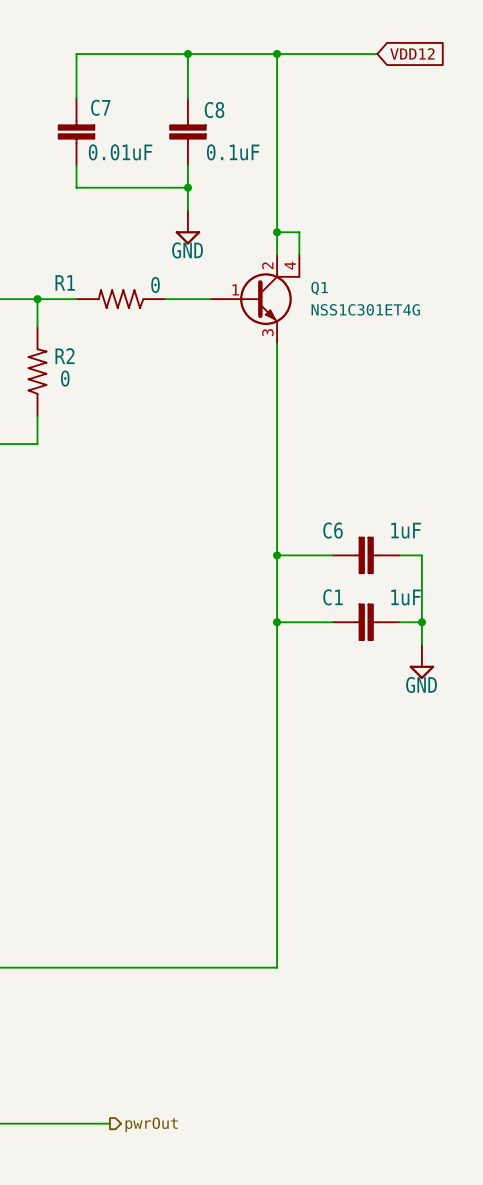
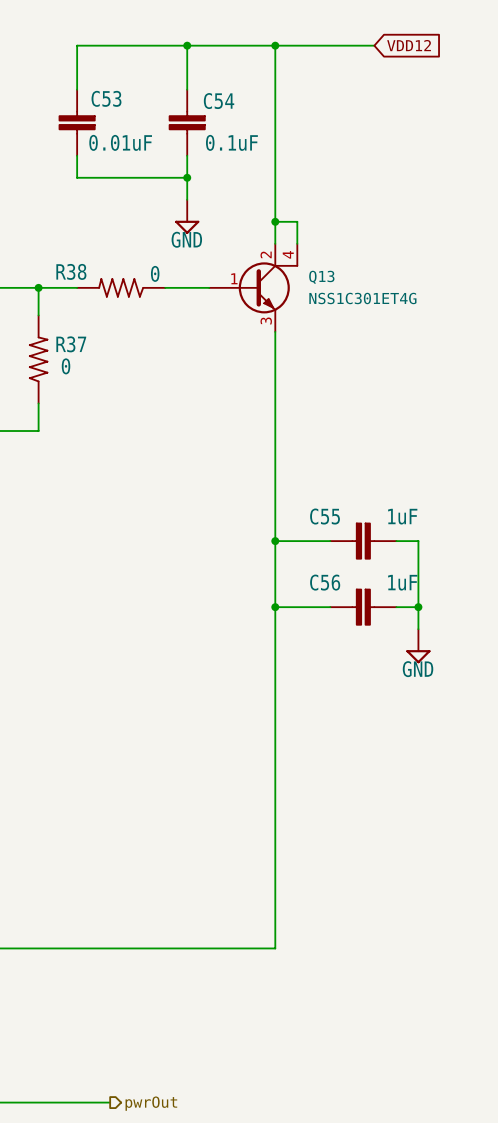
C7 name: C7 (100, 107) -> C53 (106, 98)
C8 name: C8 (214, 110) -> C54 (219, 101)
R1 name: R1 (65, 282) -> R38 (71, 271)
Q1 name: Q1 (319, 288) -> Q13 (321, 277)
R2 name: R2 (65, 356) -> R37 (71, 344)
C6 name: C6 (333, 530) -> C55 (325, 516)
C1 name: C1 (332, 597) -> C56 (325, 582)

